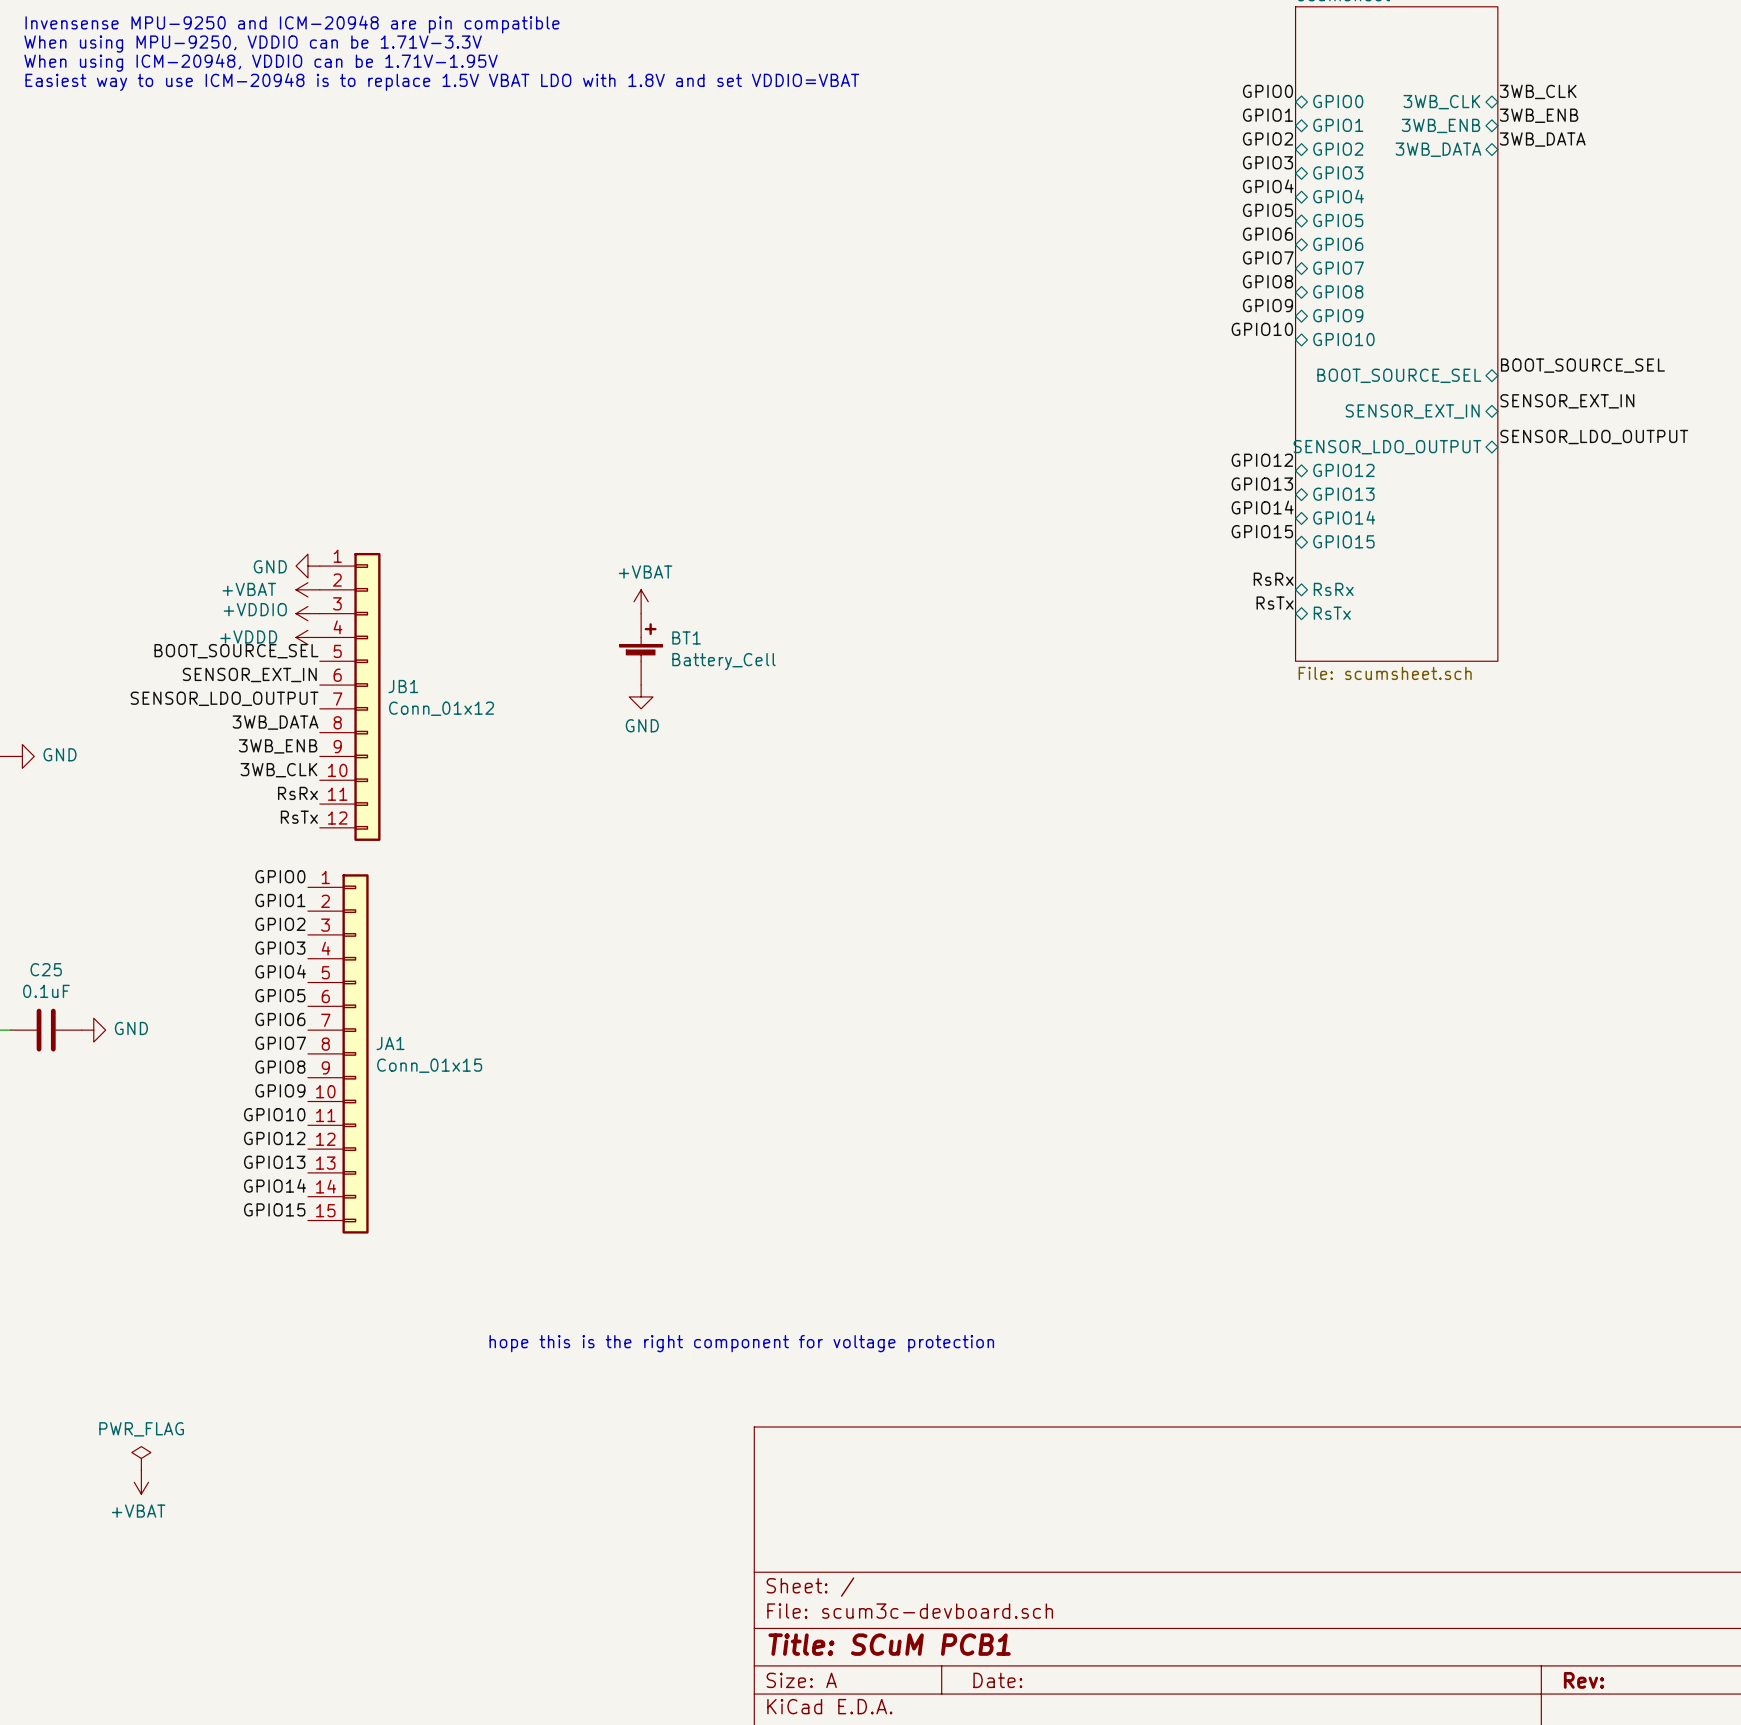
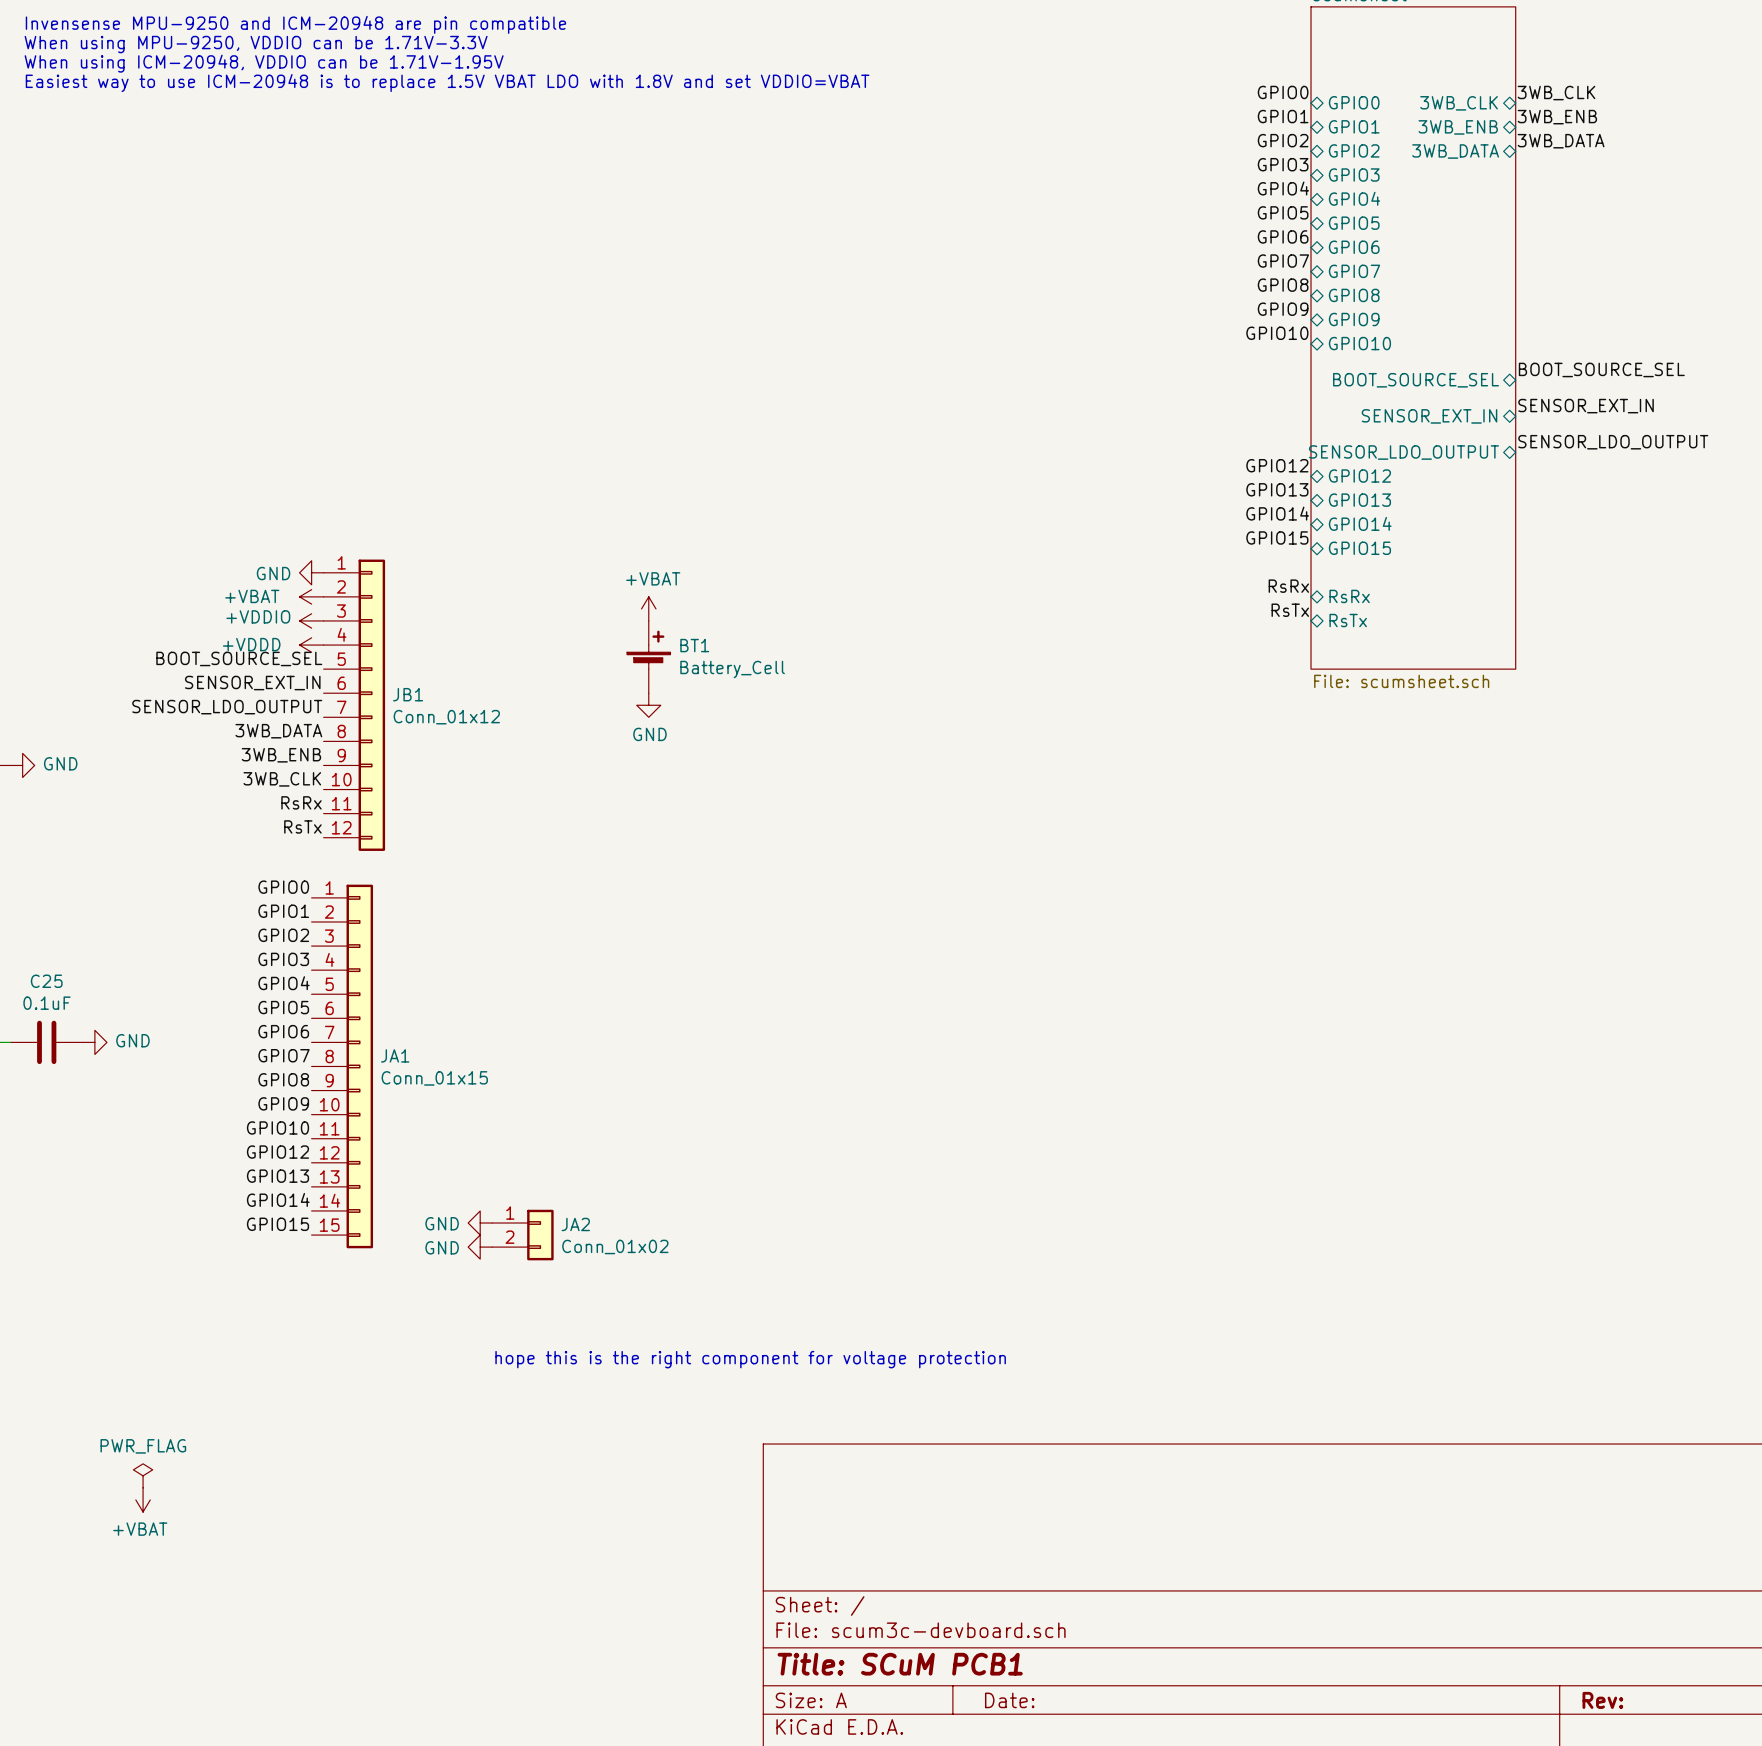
power symbol: none -> GND (480, 1223)
JA2: none -> Conn_01x02 (522, 1235)
power symbol: none -> GND (480, 1247)

